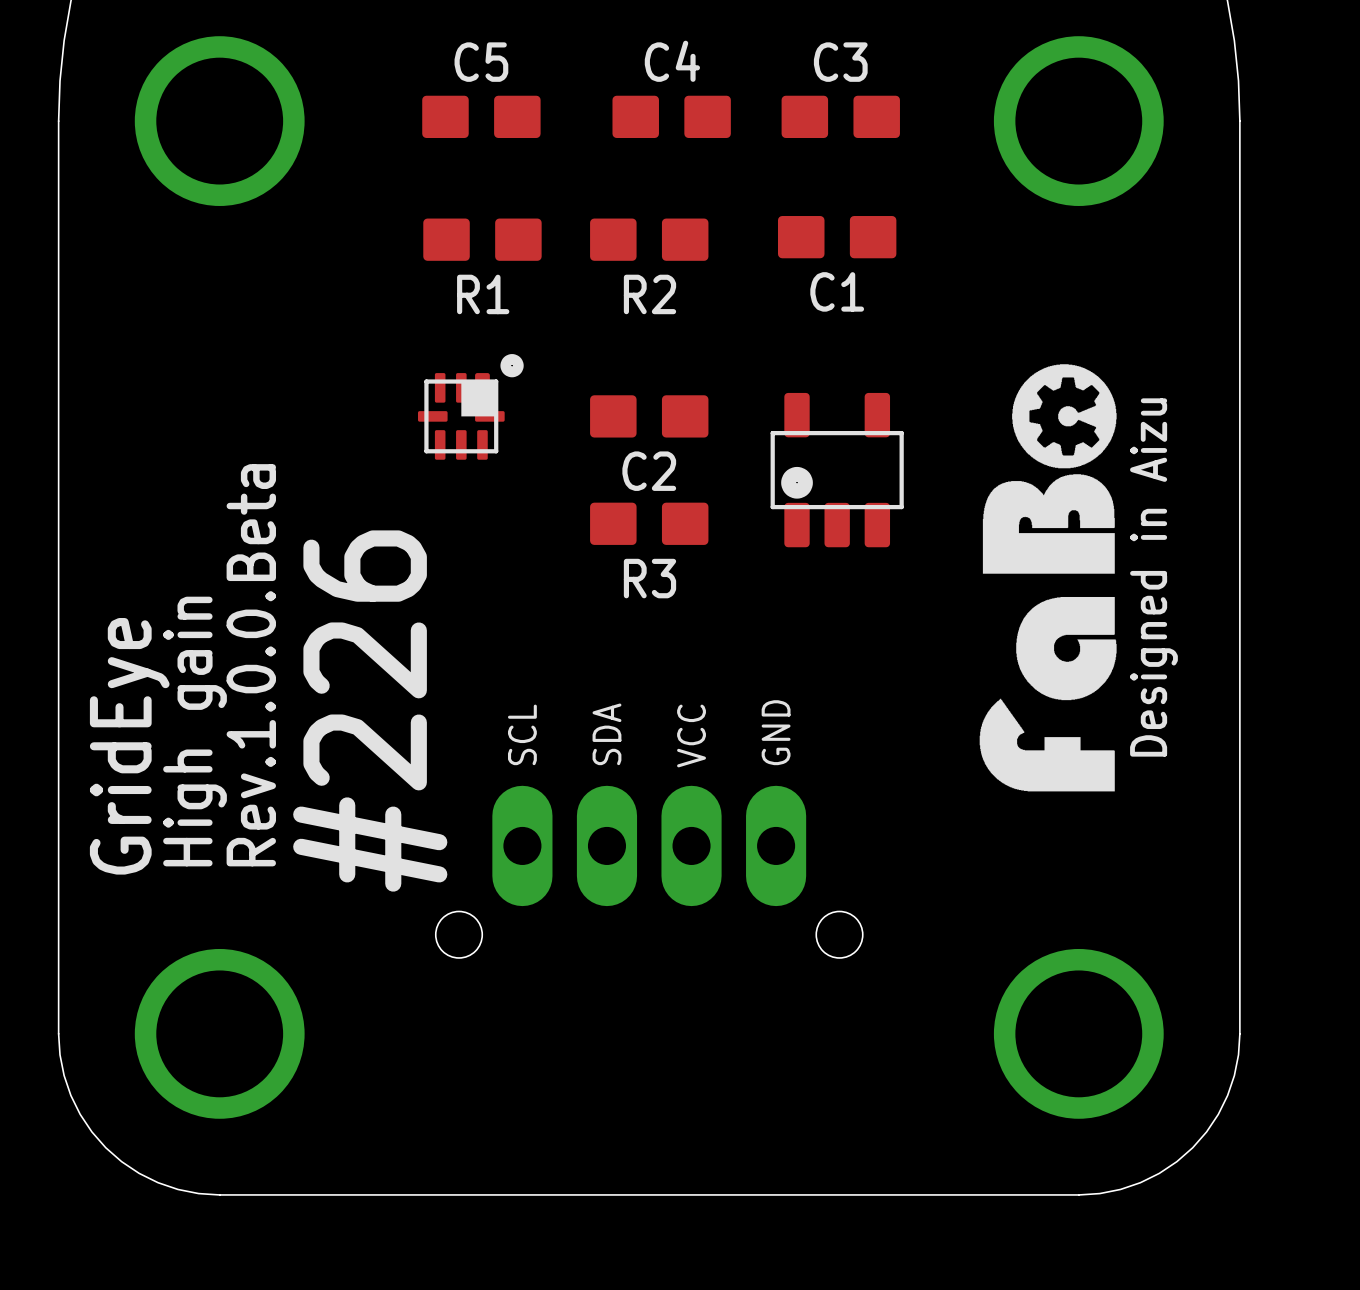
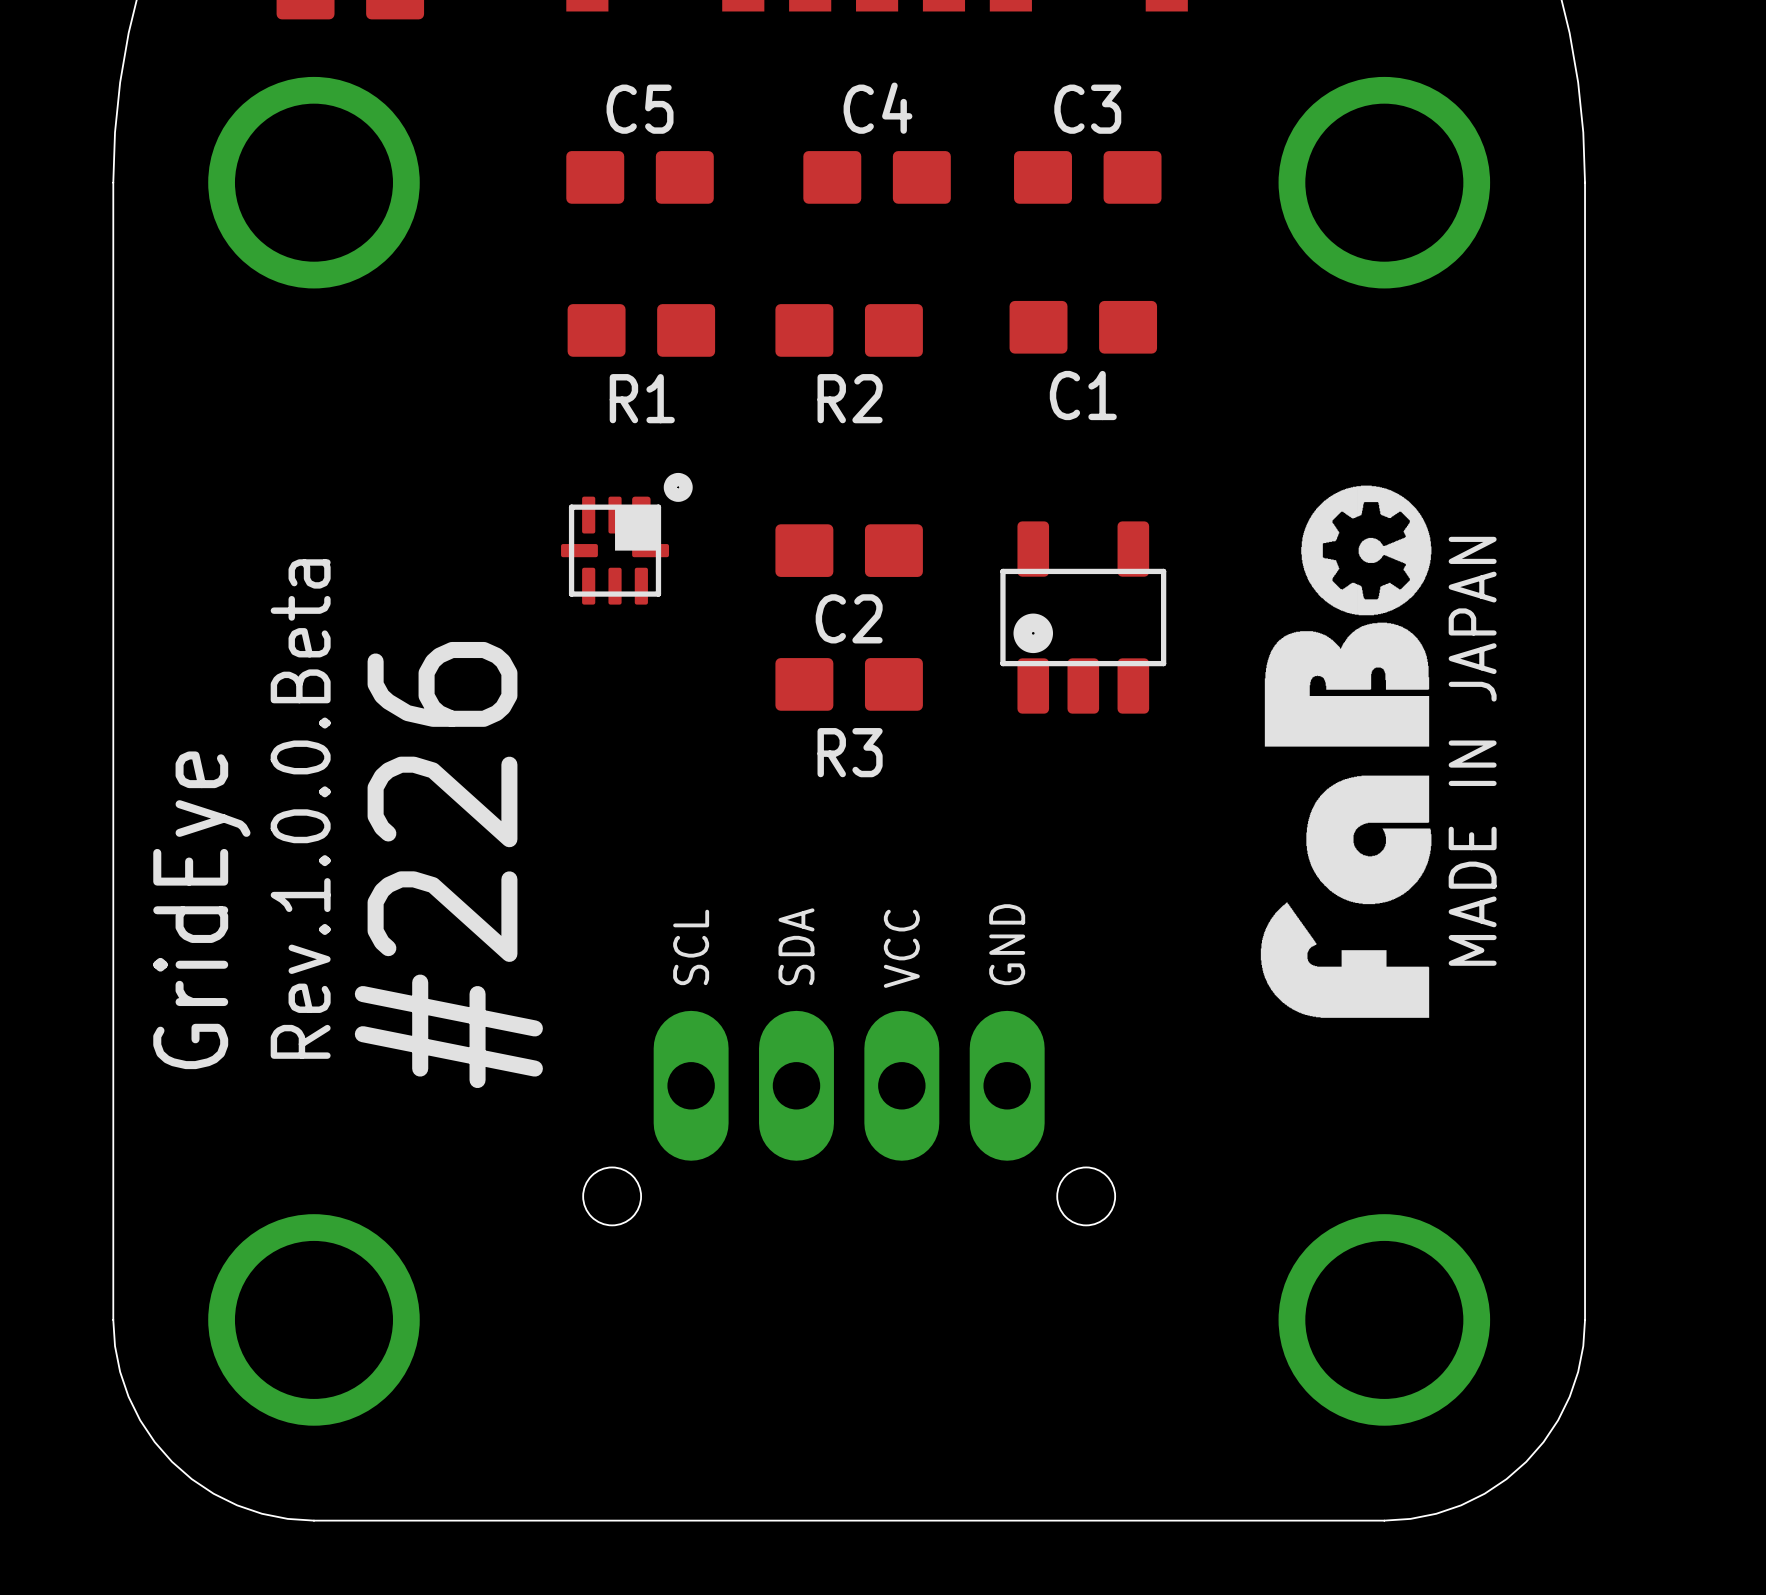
text: Designed in Aizu (1153, 577) -> MADE IN JAPAN (1472, 751)
text position: Rev.1.0.0.Beta (251, 665) -> Rev.1.0.0.Beta (300, 809)
text position: #226 (370, 711) -> #226 (448, 865)
text: High gain (195, 731) -> none
text position: GridEye (129, 746) -> GridEye (201, 910)

